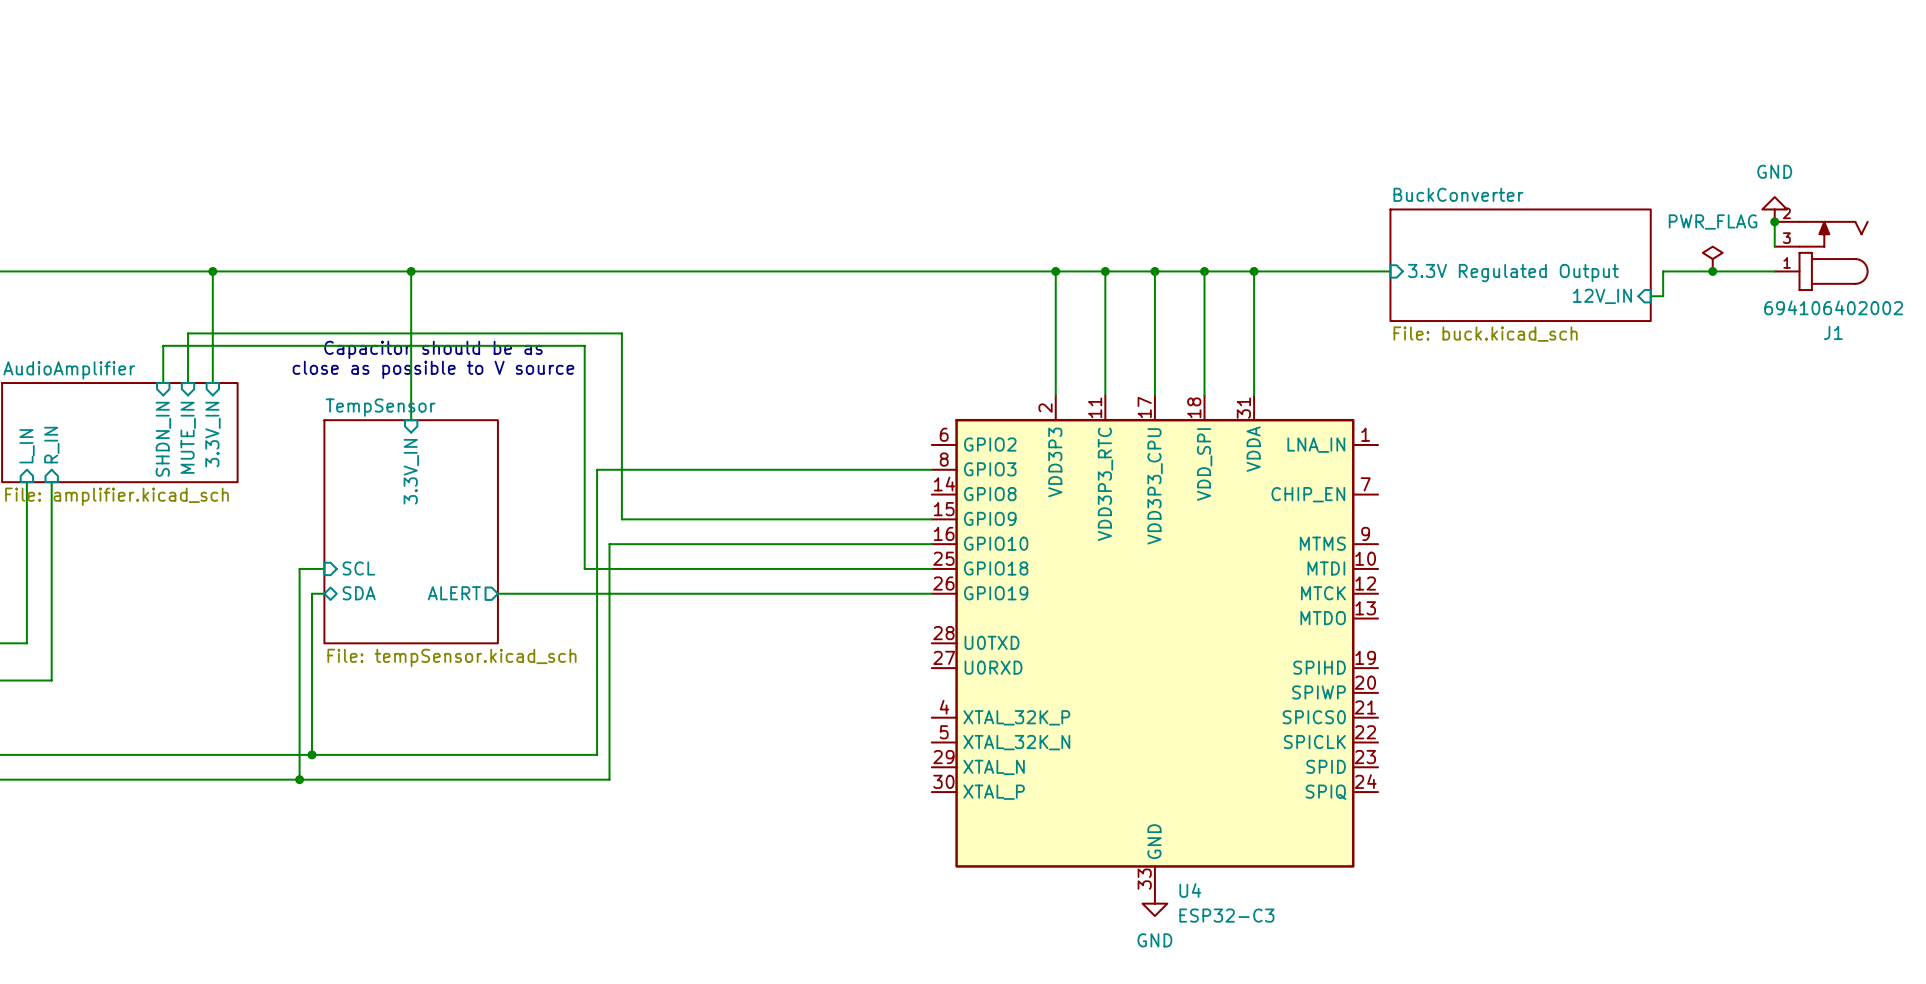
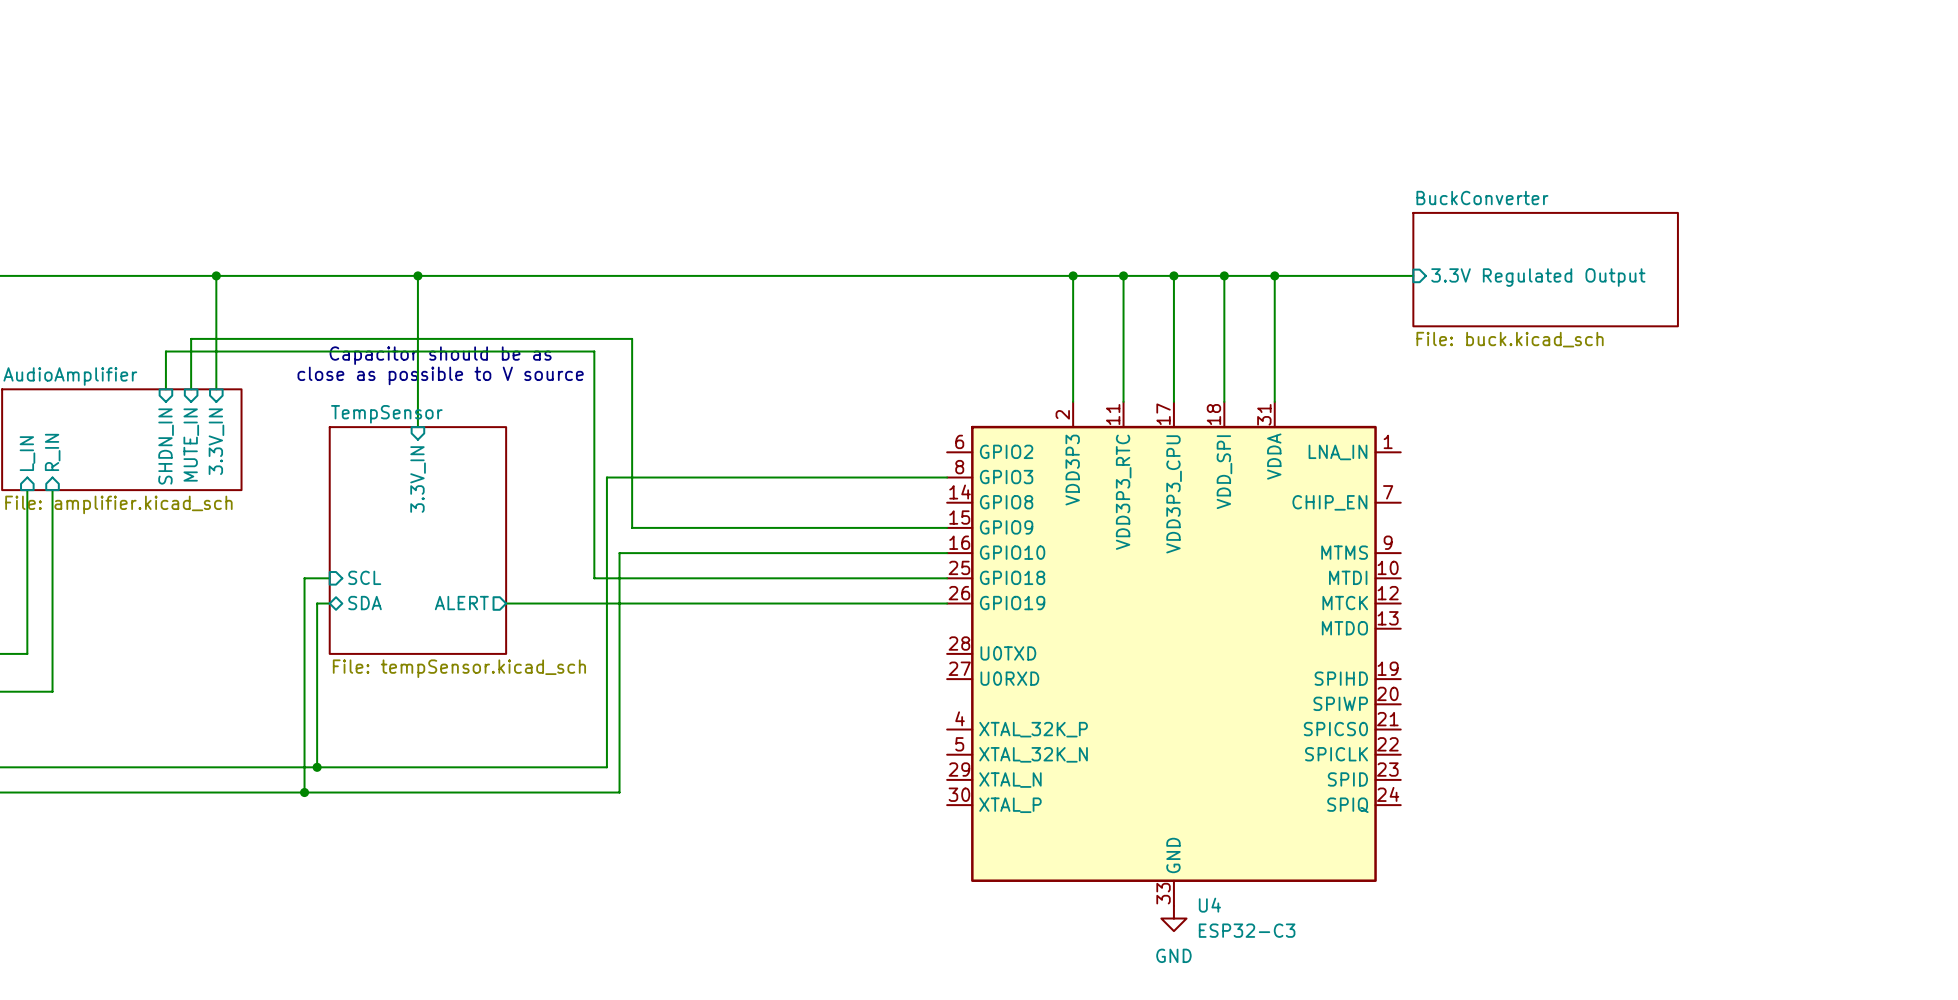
power symbol: GND (1774, 209) -> none
wire: (1774, 221) (1774, 246) -> none
junction: (1774, 221) -> none
J1: 694106402002 (1821, 255) -> none
power symbol: PWR_FLAG (1712, 259) -> none
junction: (1712, 271) -> none
wire: (1774, 271) (1663, 271) (1663, 296) (1650, 296) -> none
sheet pin: 12V_IN (1602, 296) -> none

